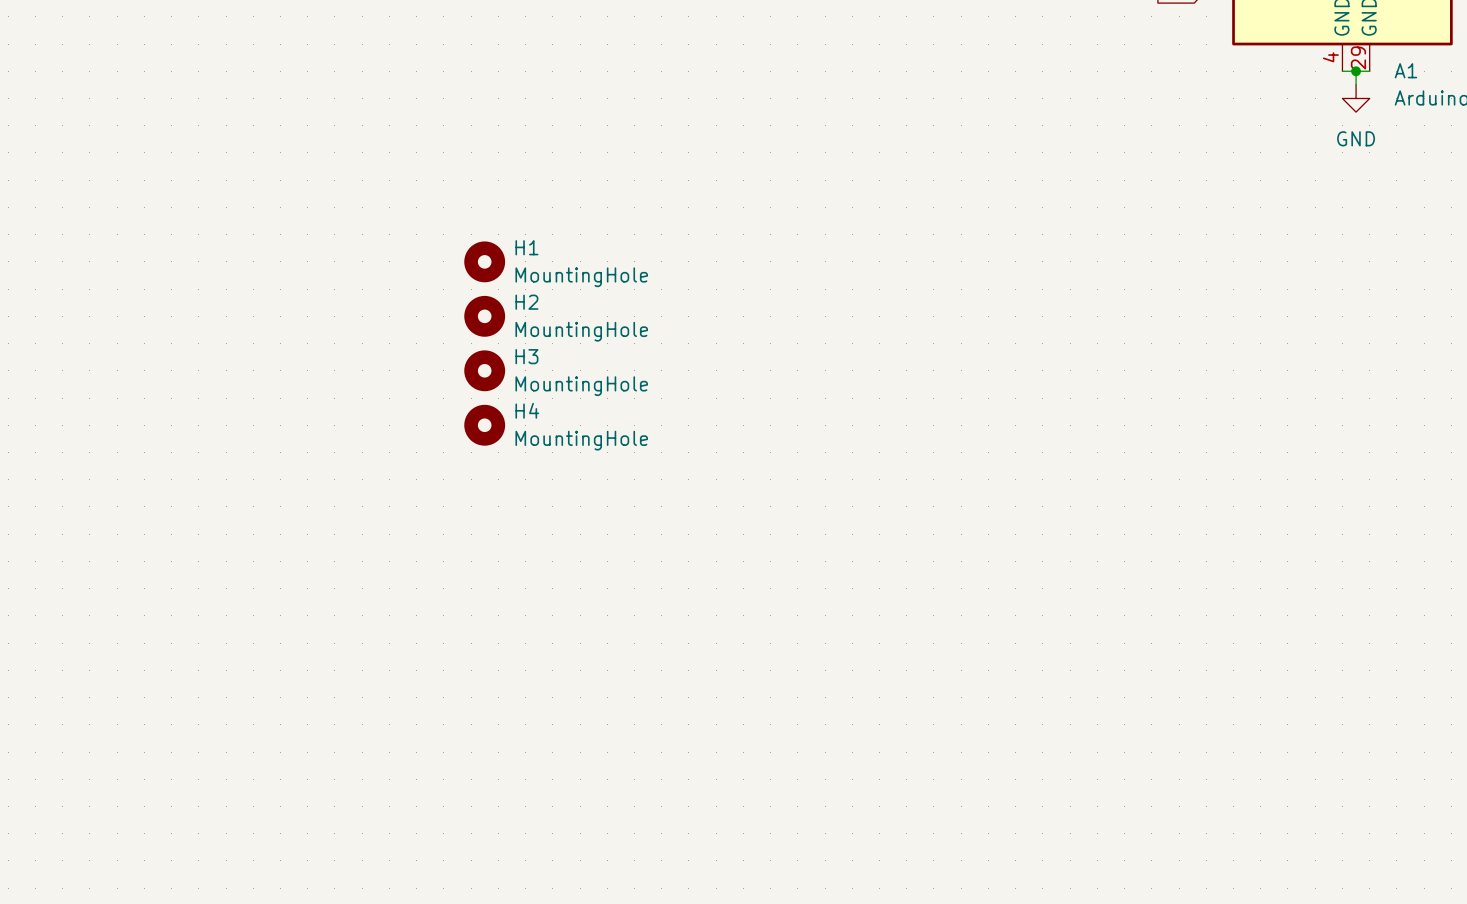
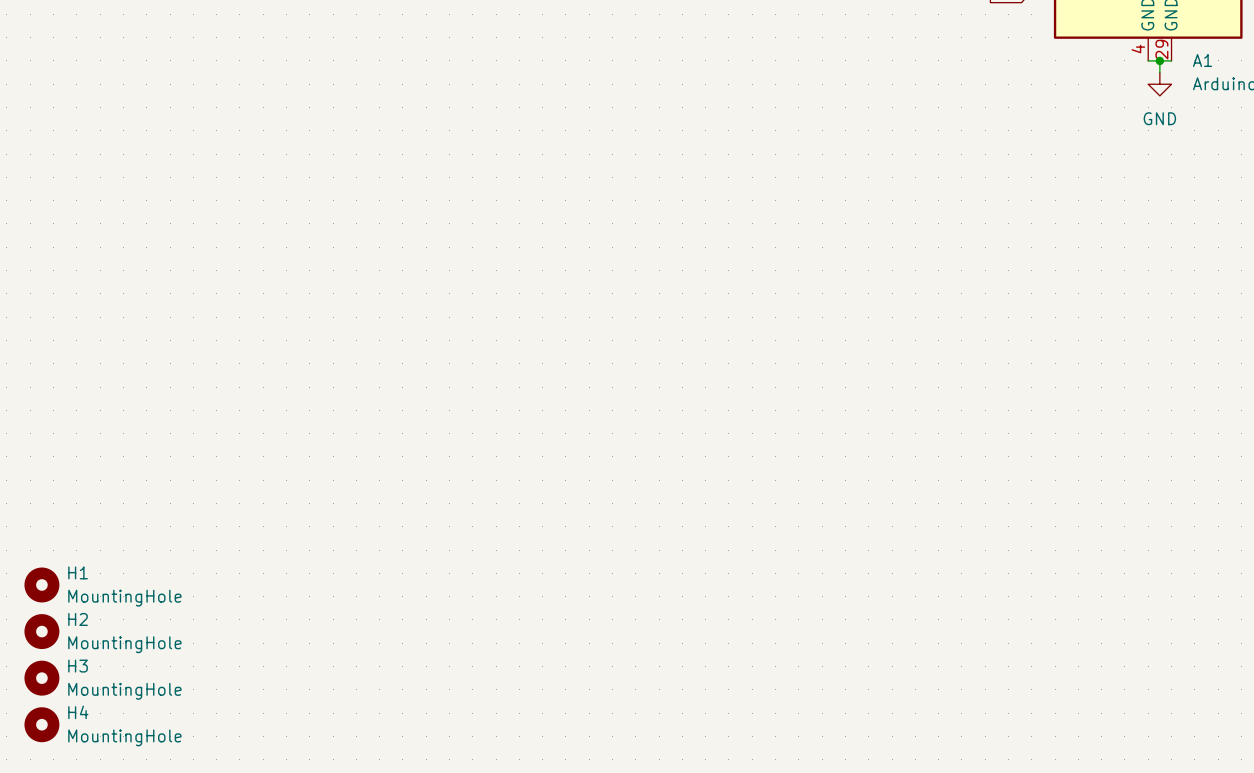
H1 position: (484, 261) -> (41, 584)
H2 position: (484, 316) -> (41, 631)
H3 position: (484, 370) -> (41, 678)
H4 position: (484, 425) -> (41, 724)

